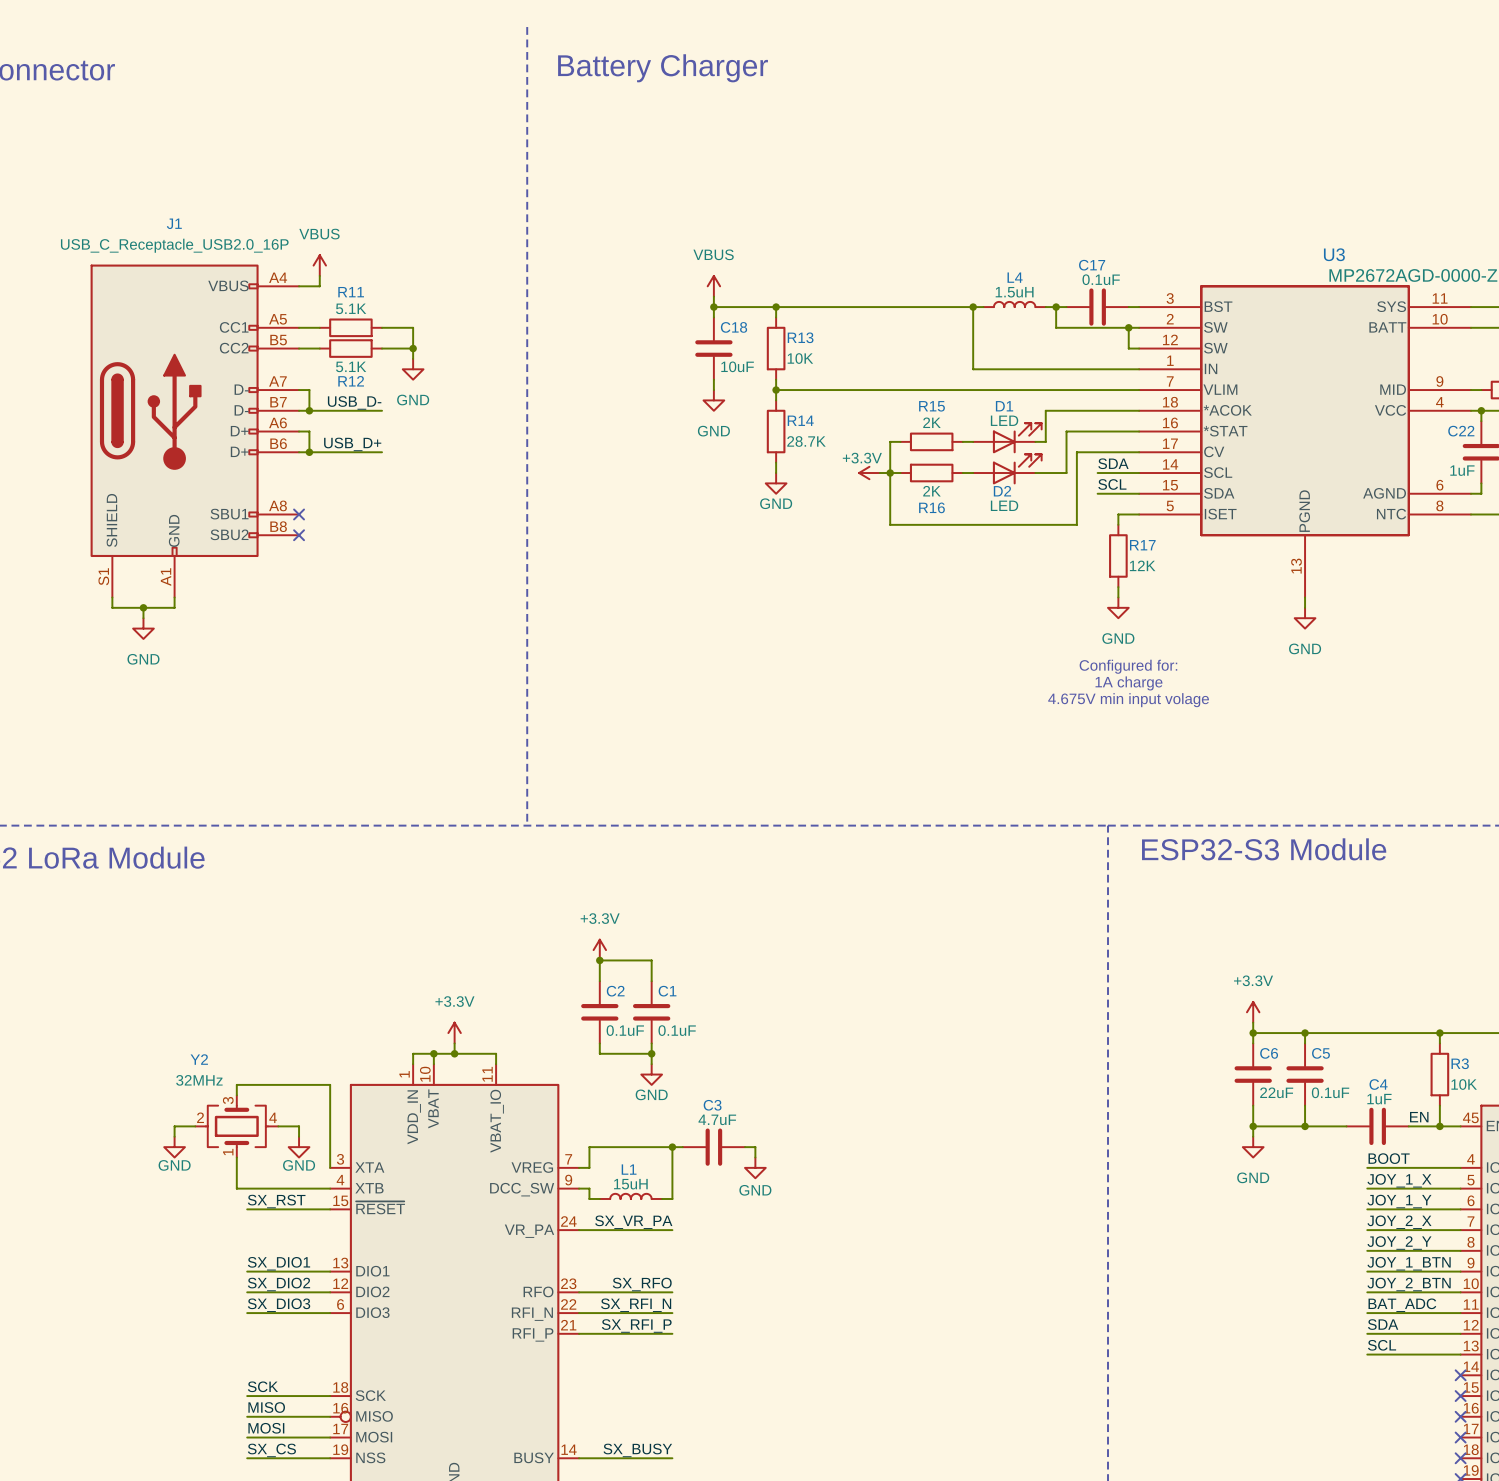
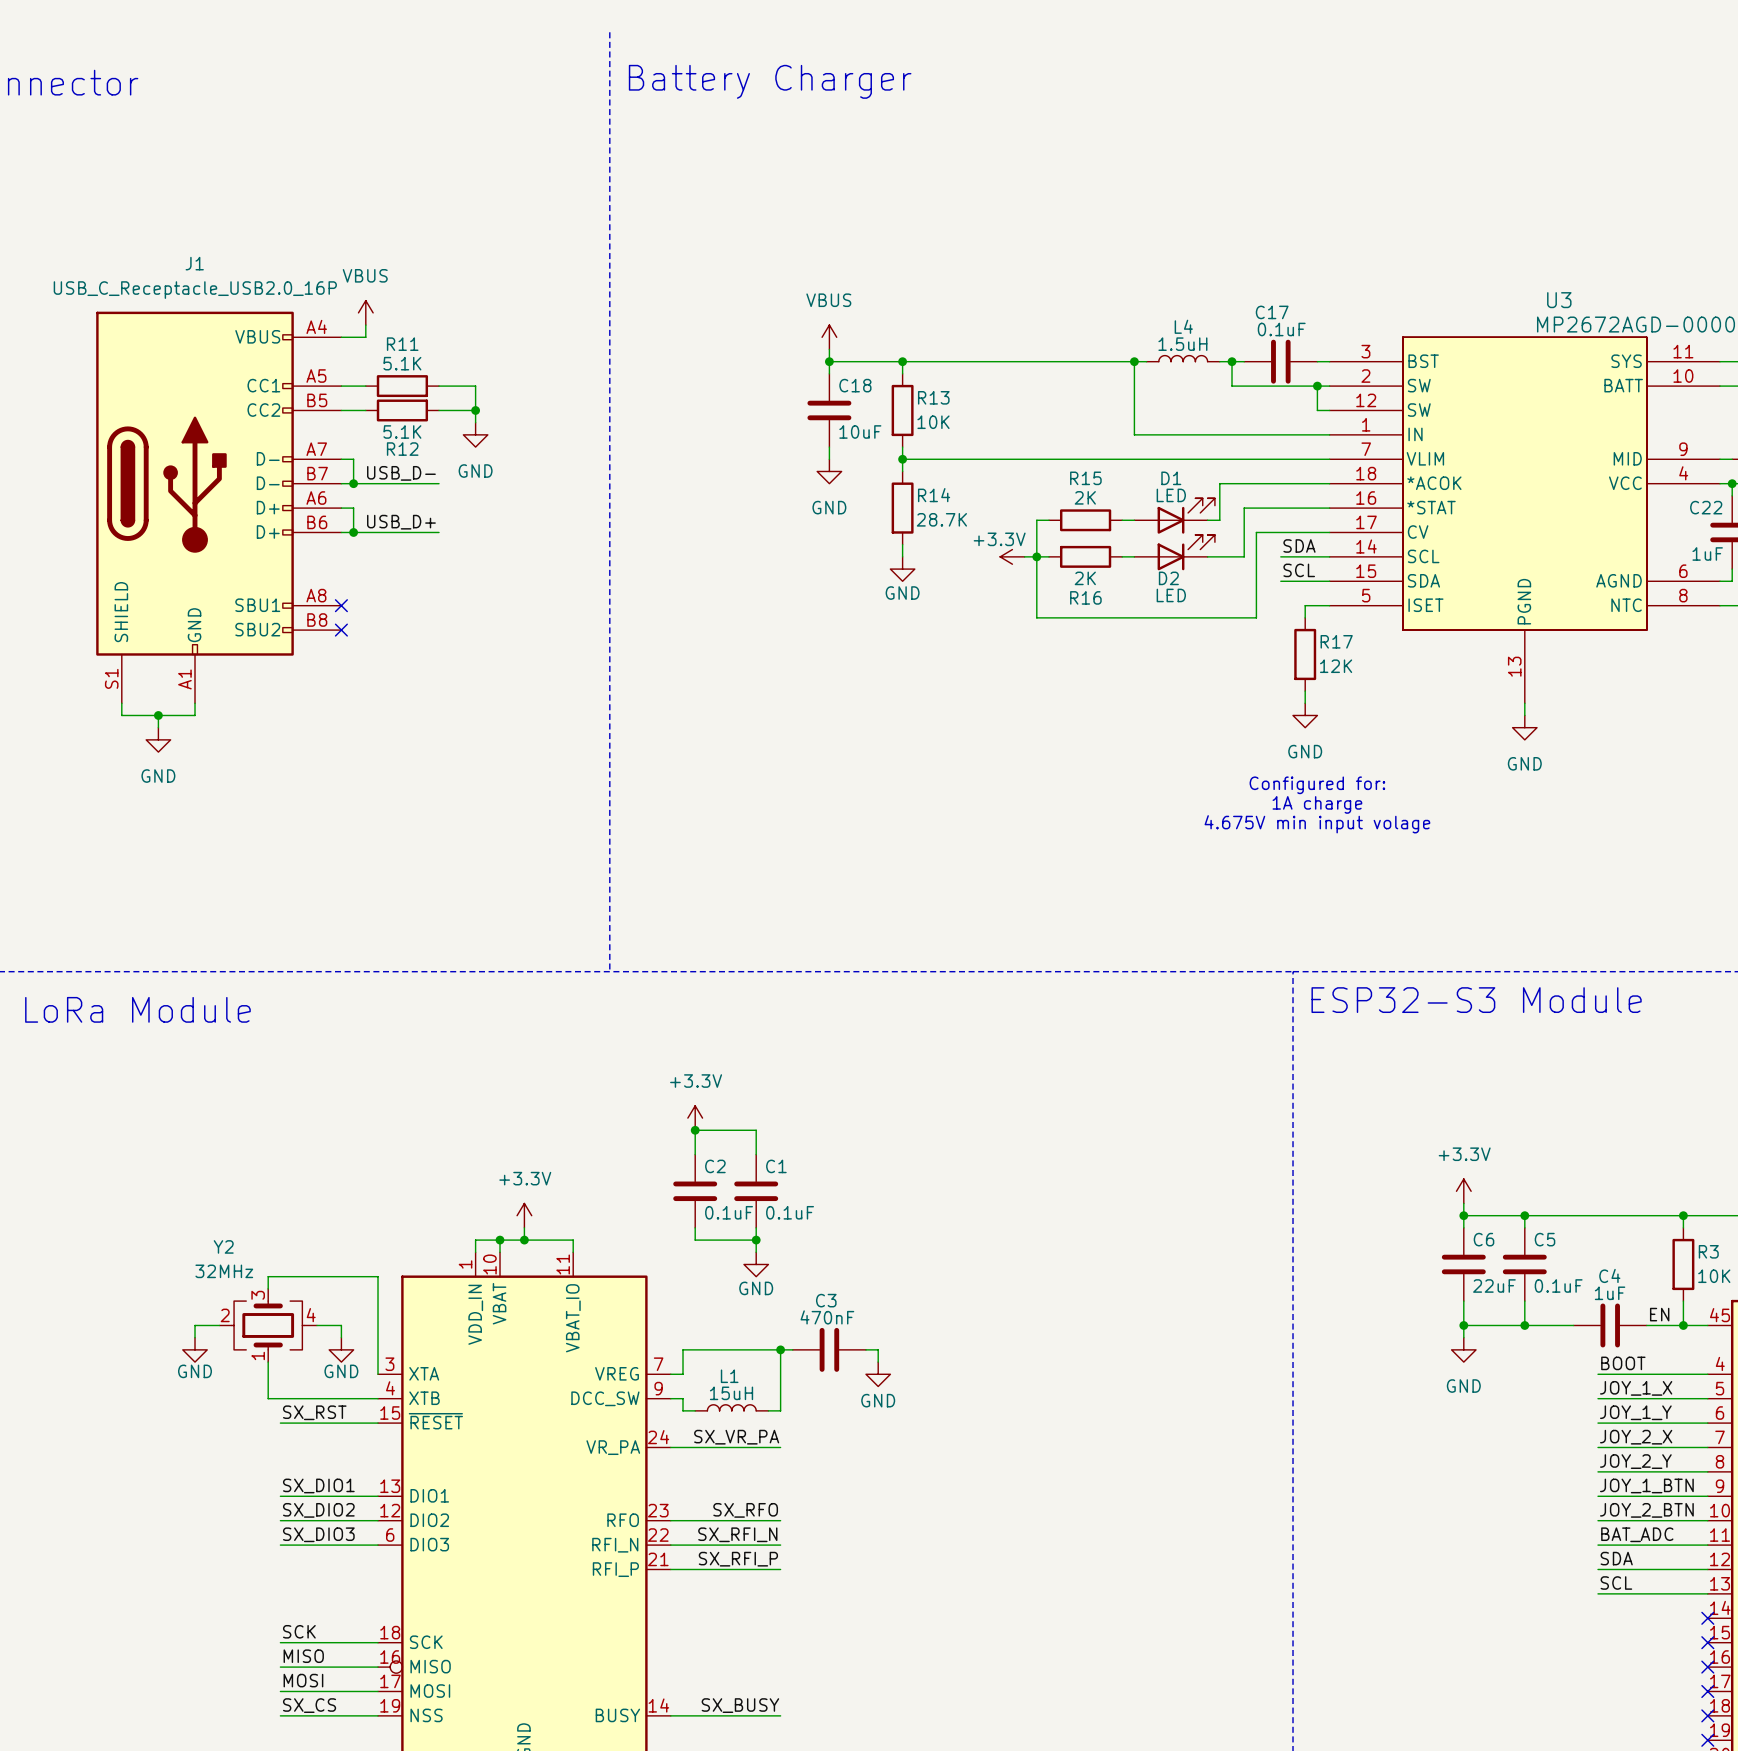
C3 value: 4.7uF (717, 1119) -> 470nF (827, 1317)

